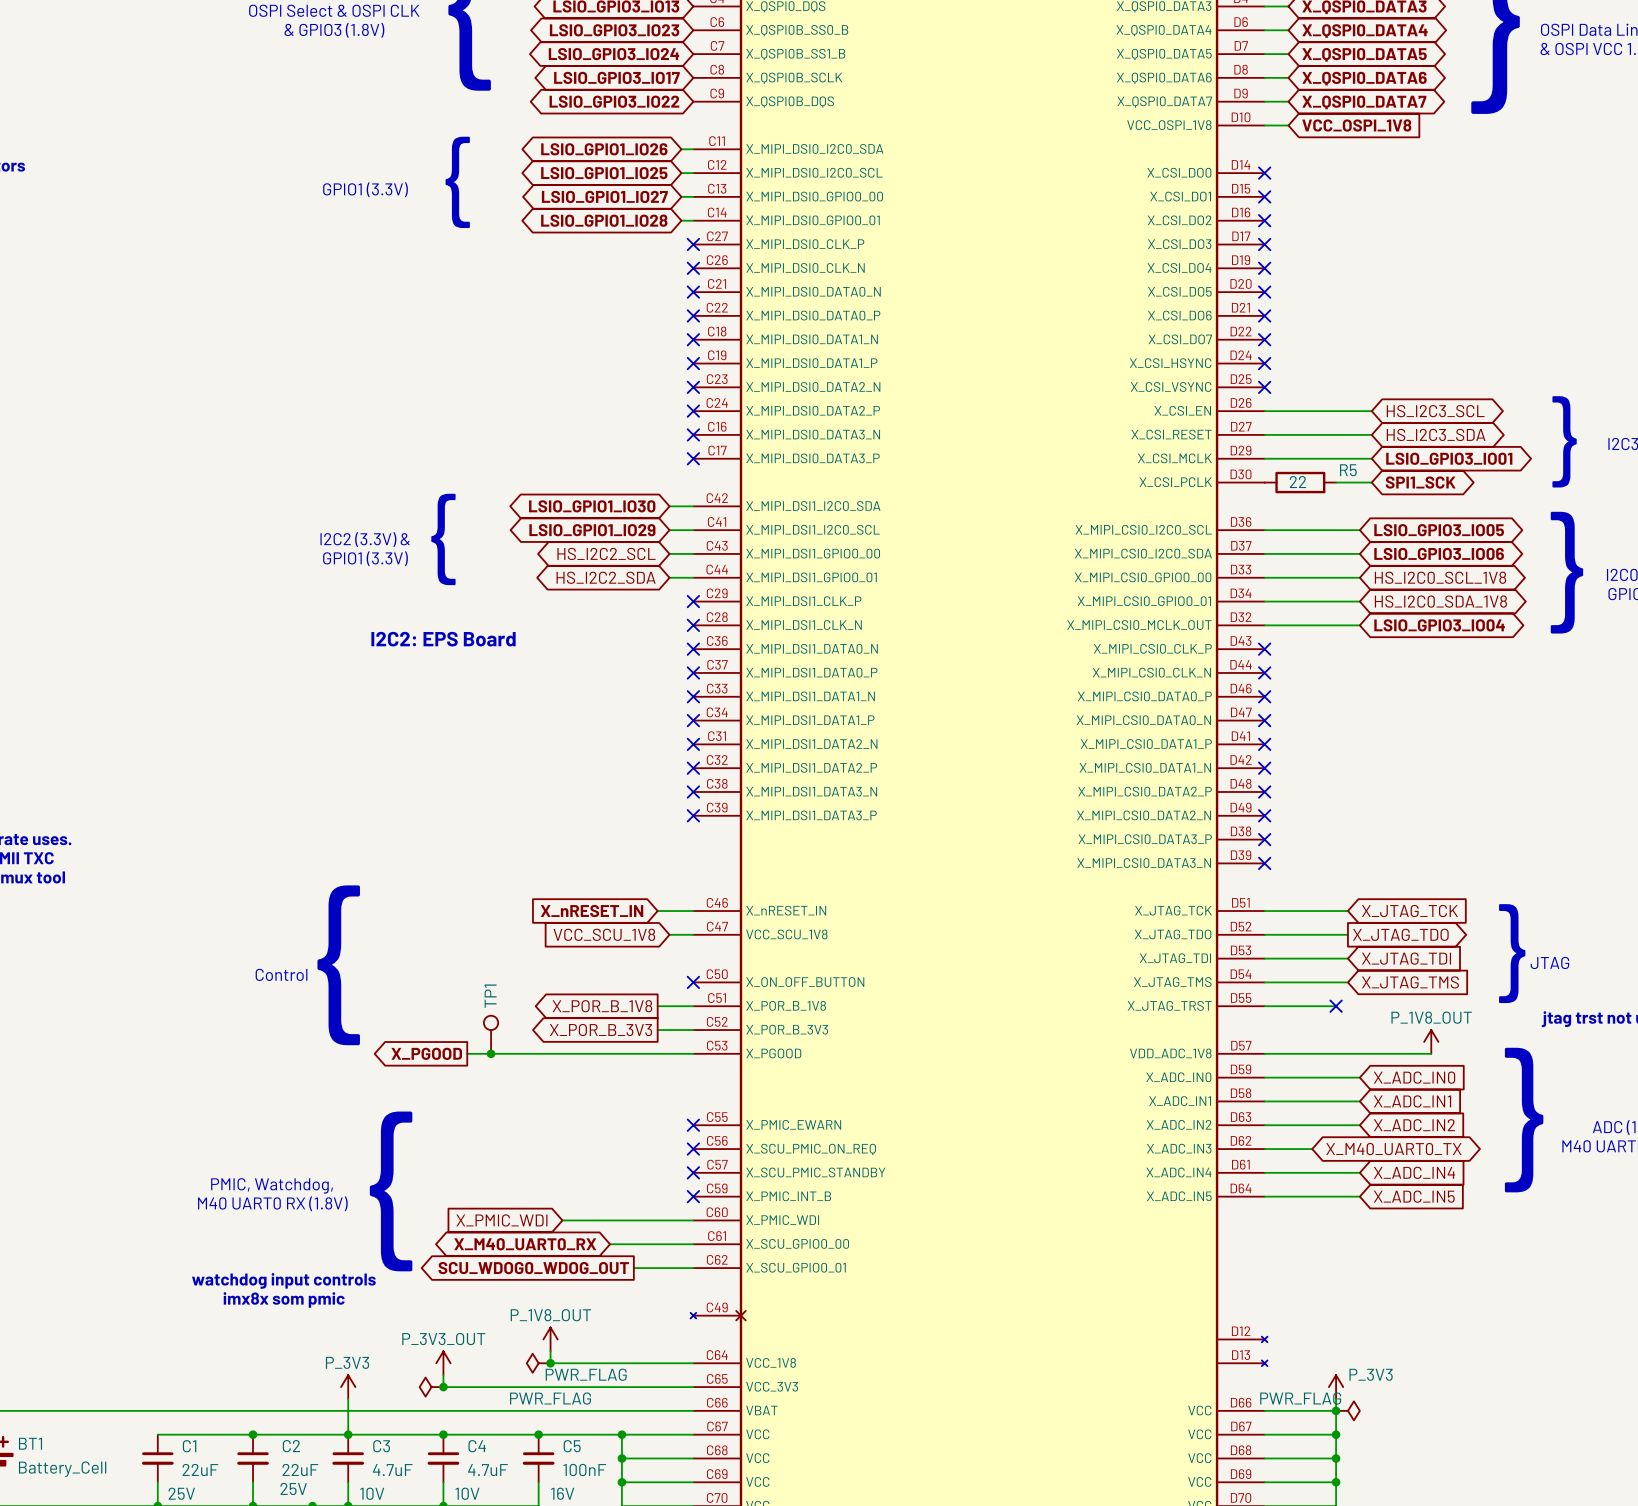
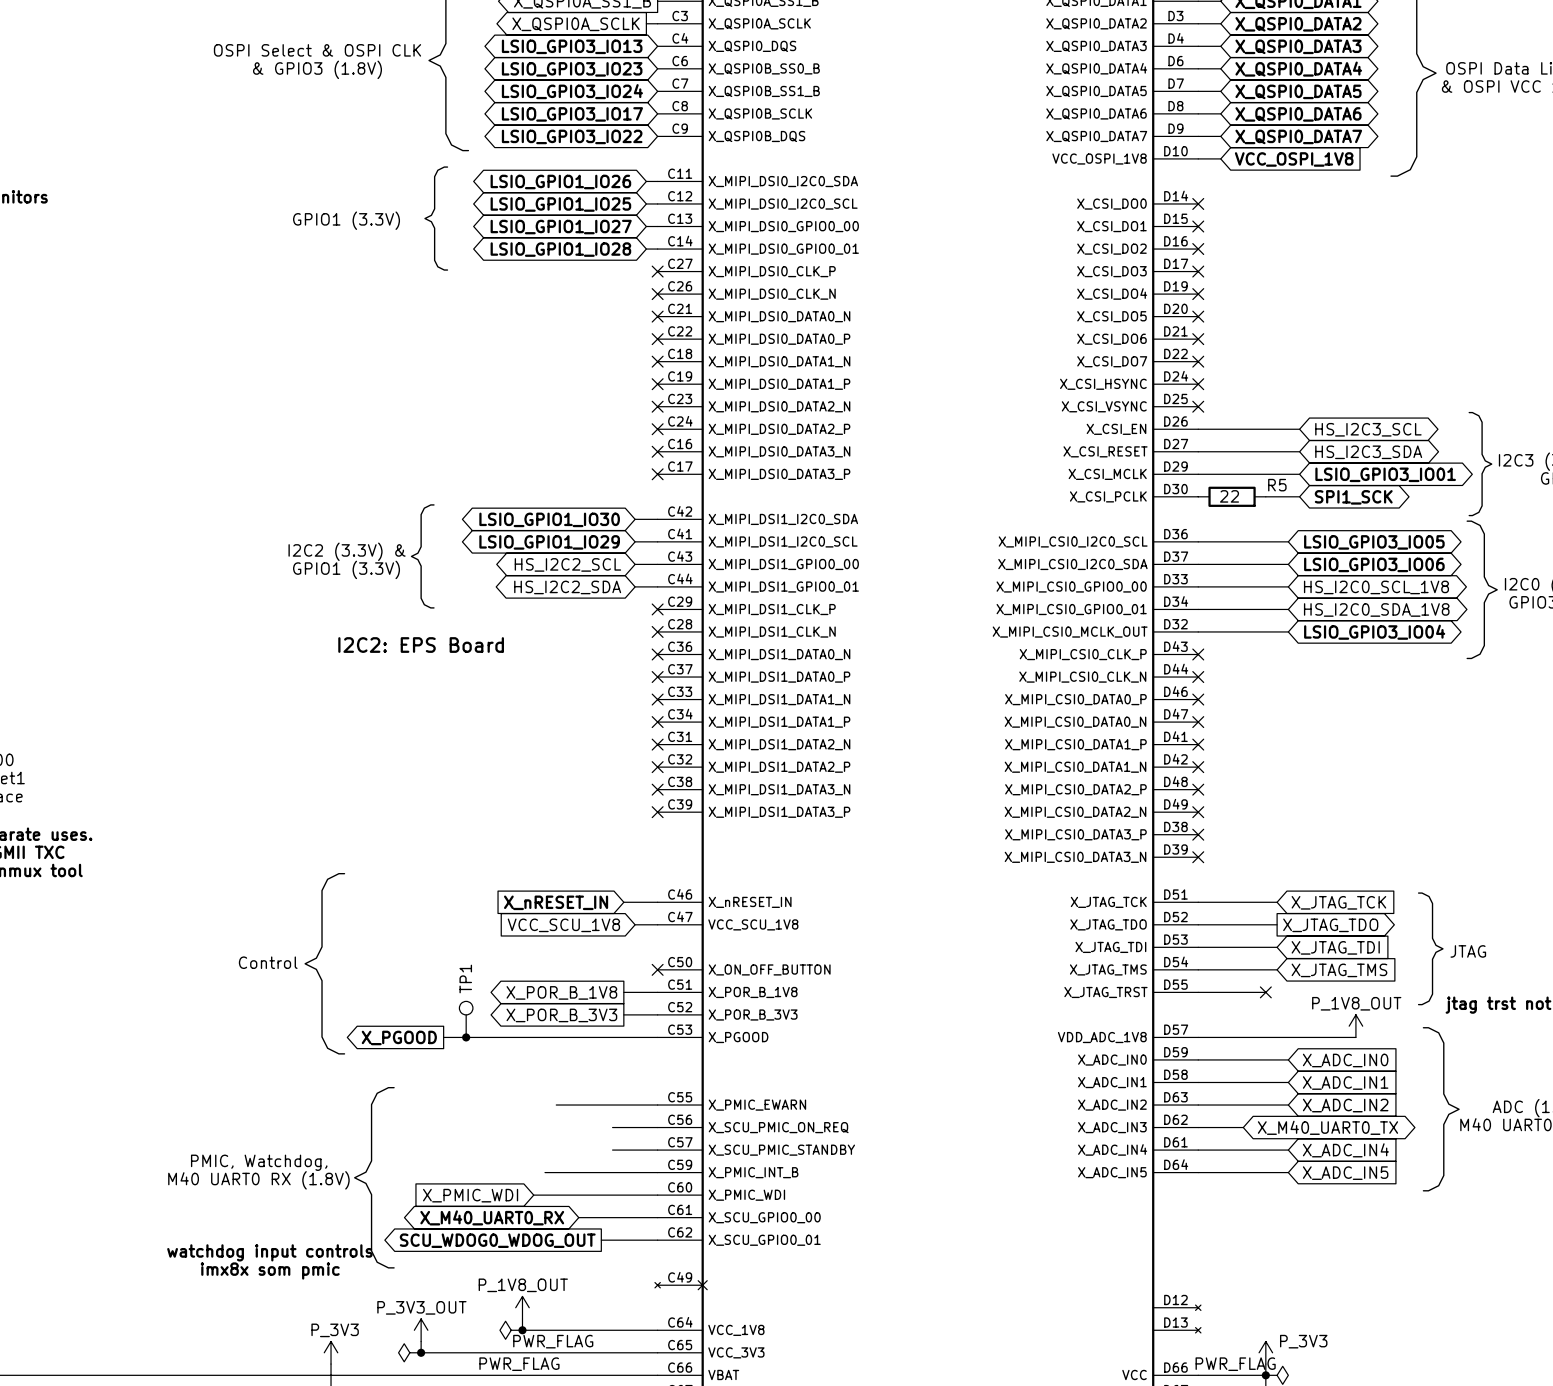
wire: none -> (556, 1105) (657, 1105)
no-connect mark: (693, 1125) -> none
wire: none -> (612, 1127) (657, 1127)
no-connect mark: (693, 1149) -> none
wire: none -> (612, 1150) (657, 1150)
no-connect mark: (693, 1172) -> none
wire: none -> (545, 1172) (657, 1172)
no-connect mark: (693, 1196) -> none

